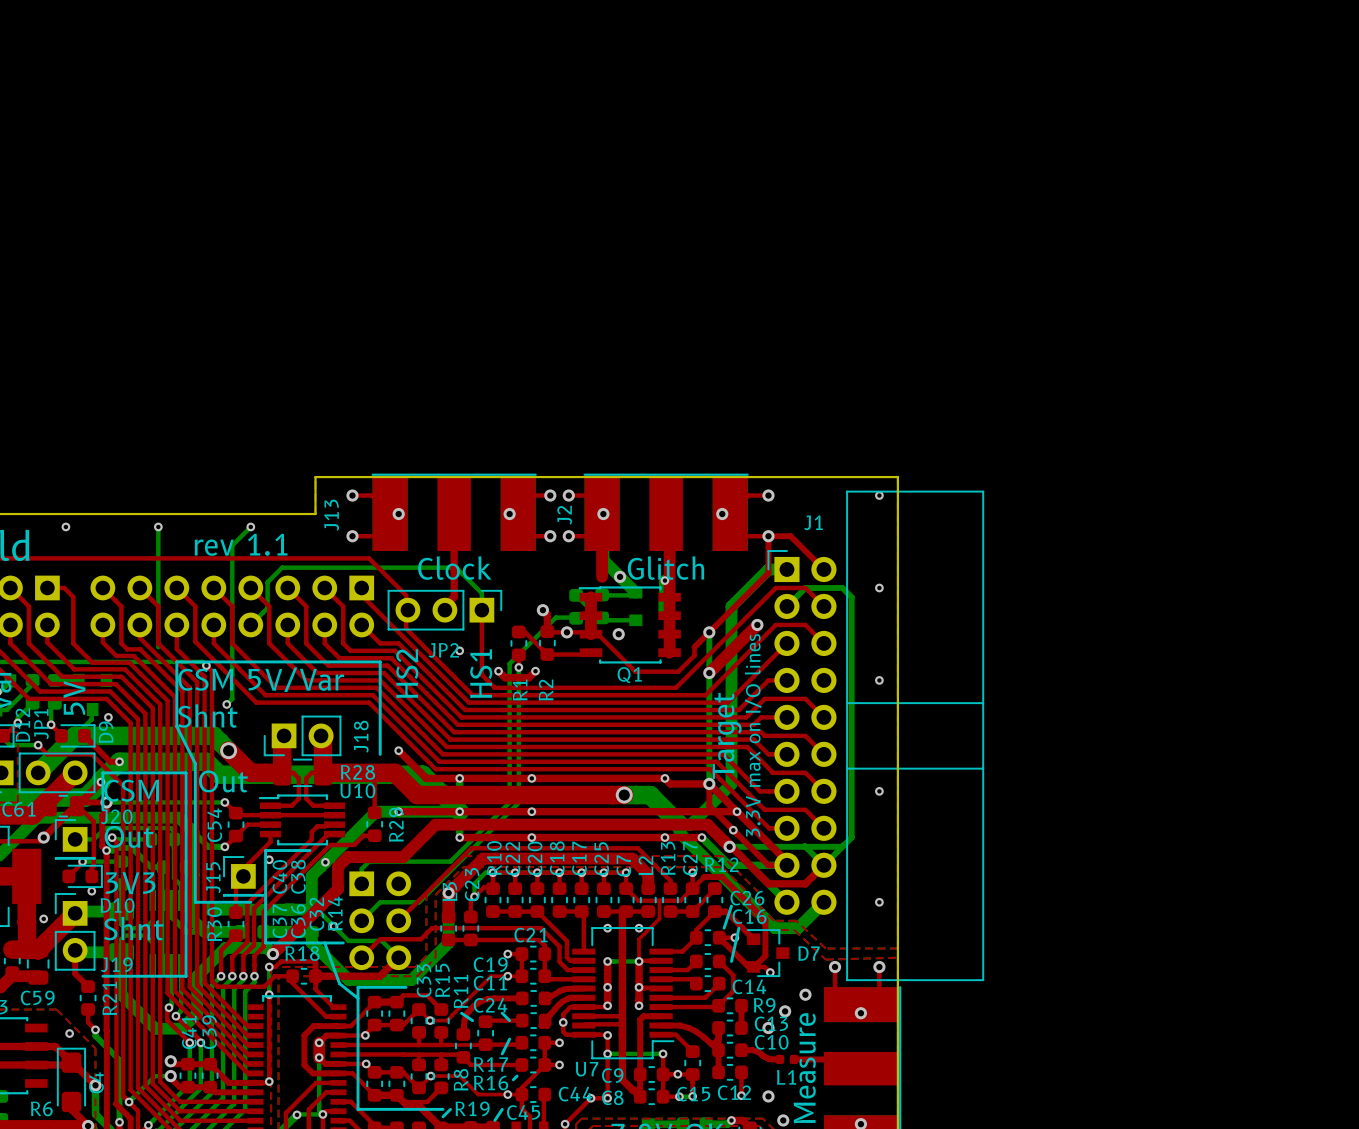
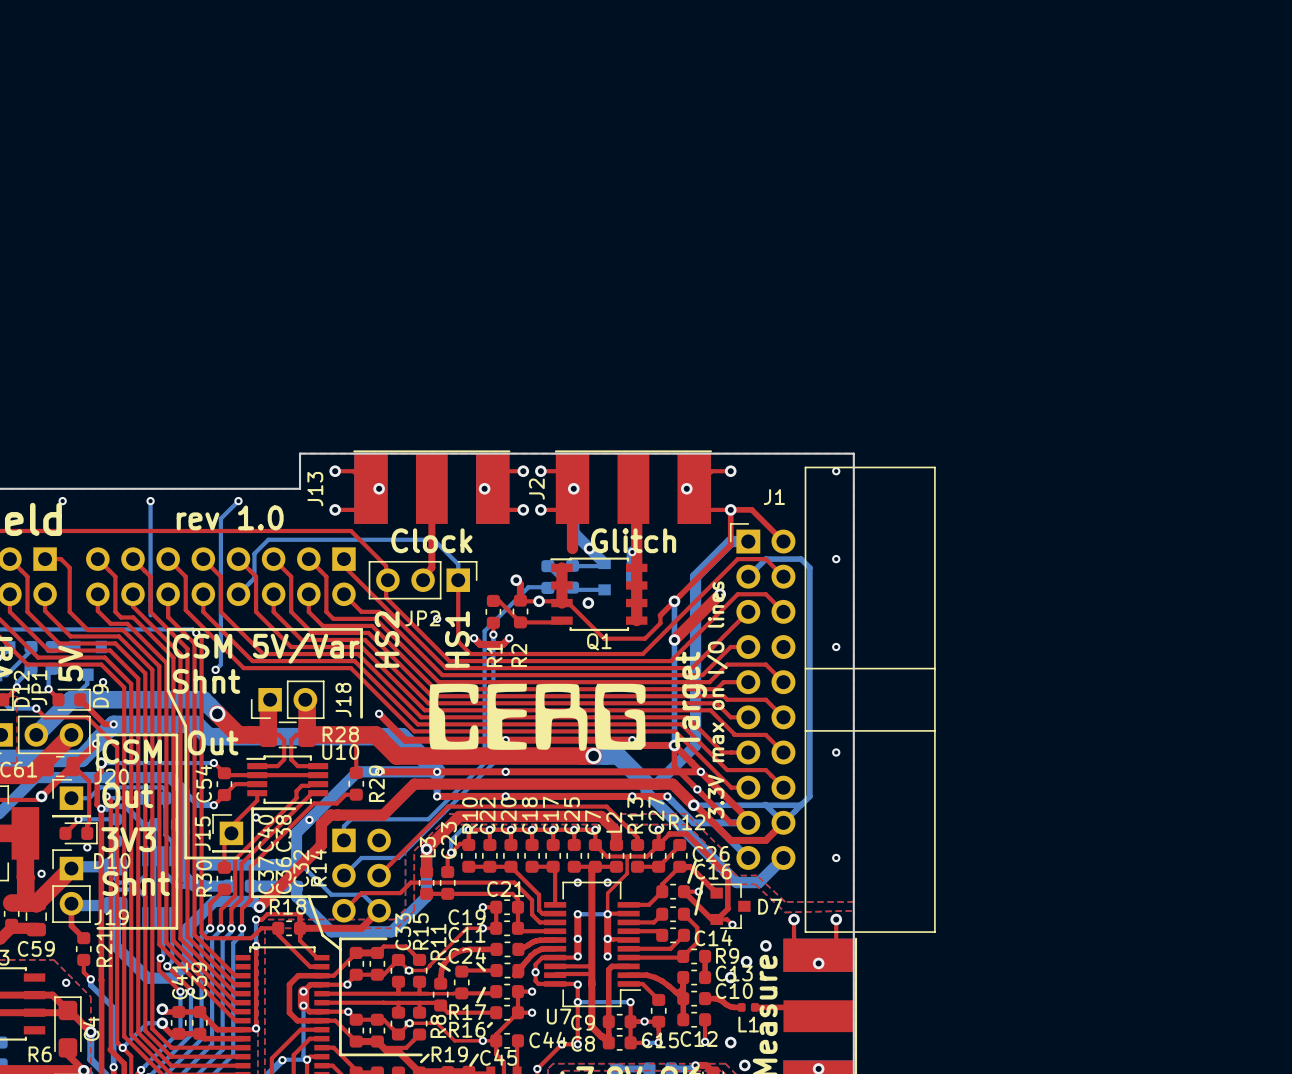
text: rev 1.1 (241, 544) -> rev 1.0 (230, 517)
drawing: none -> [429, 683, 646, 751]
top track: (106, 802) (80, 802) (77, 806) -> none

